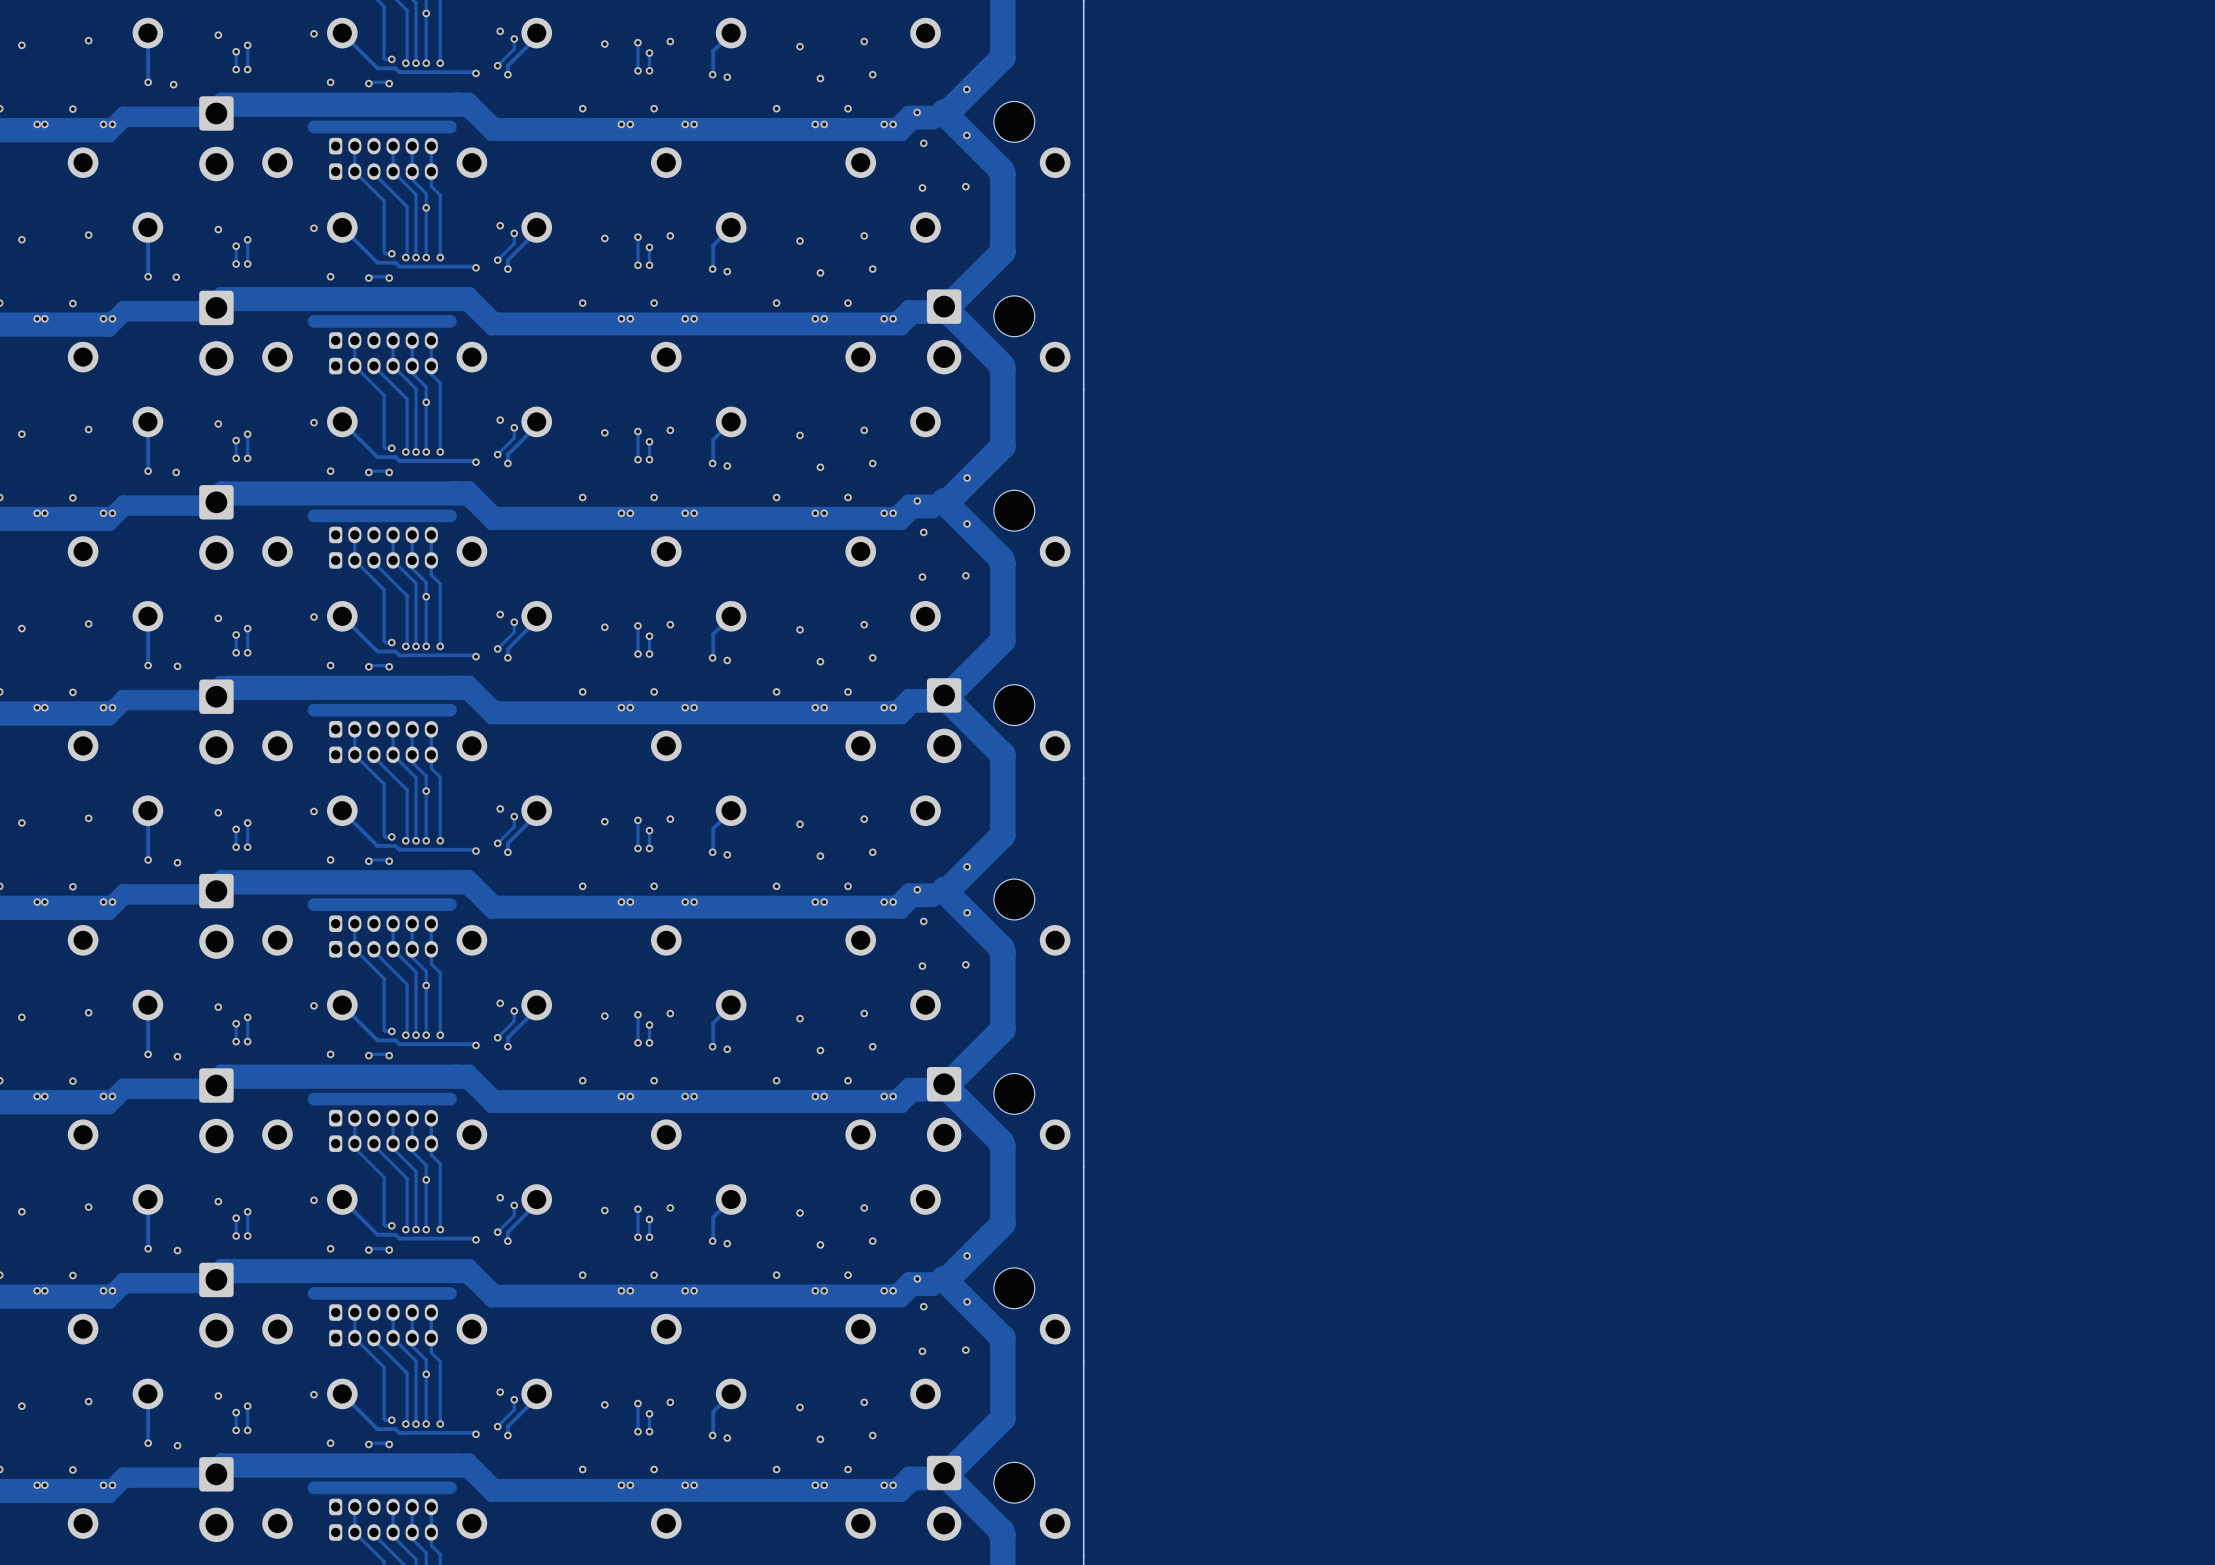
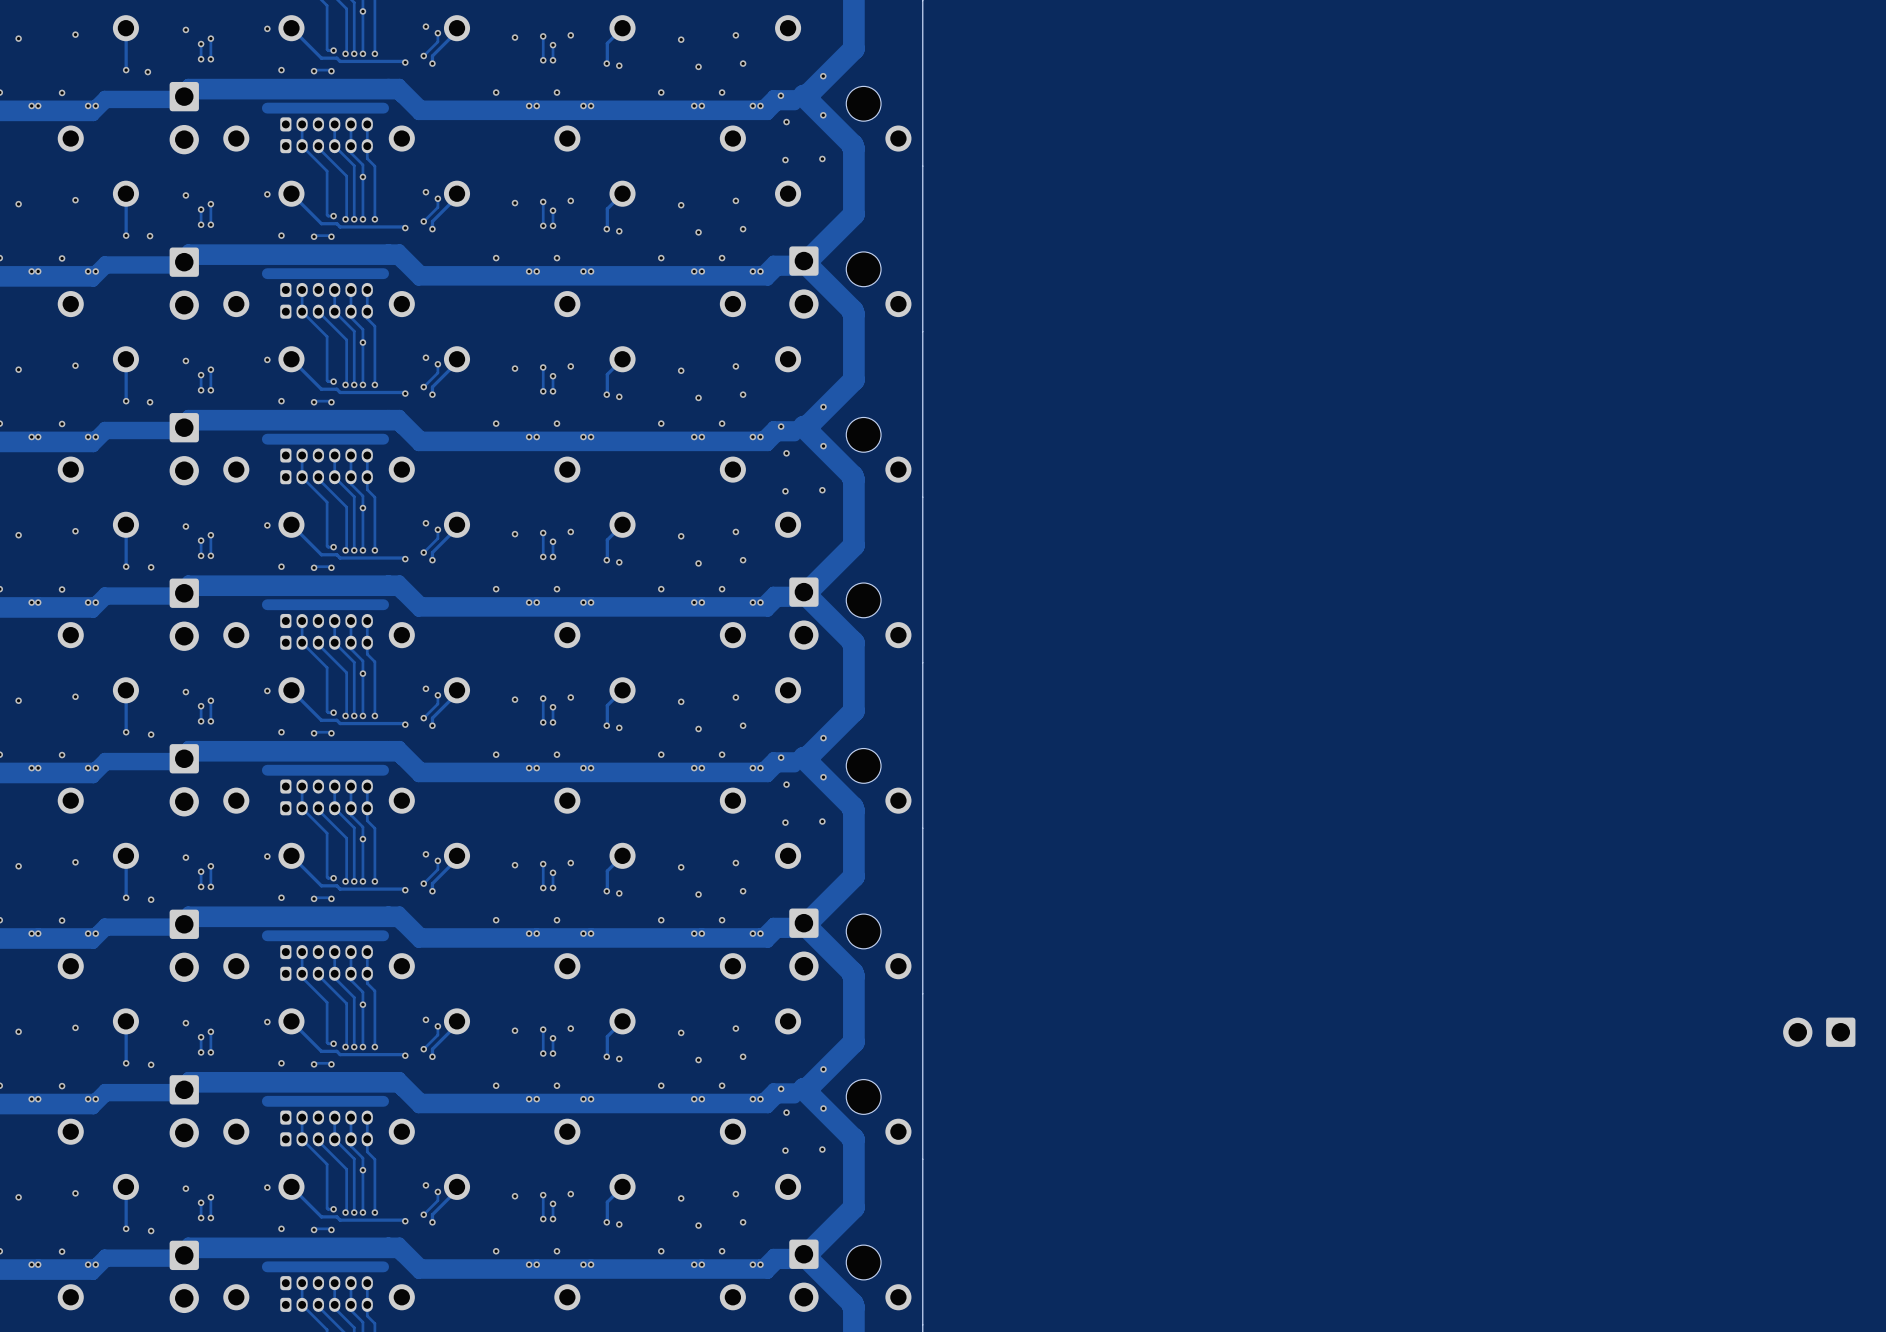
part: none -> (1819, 1032)

